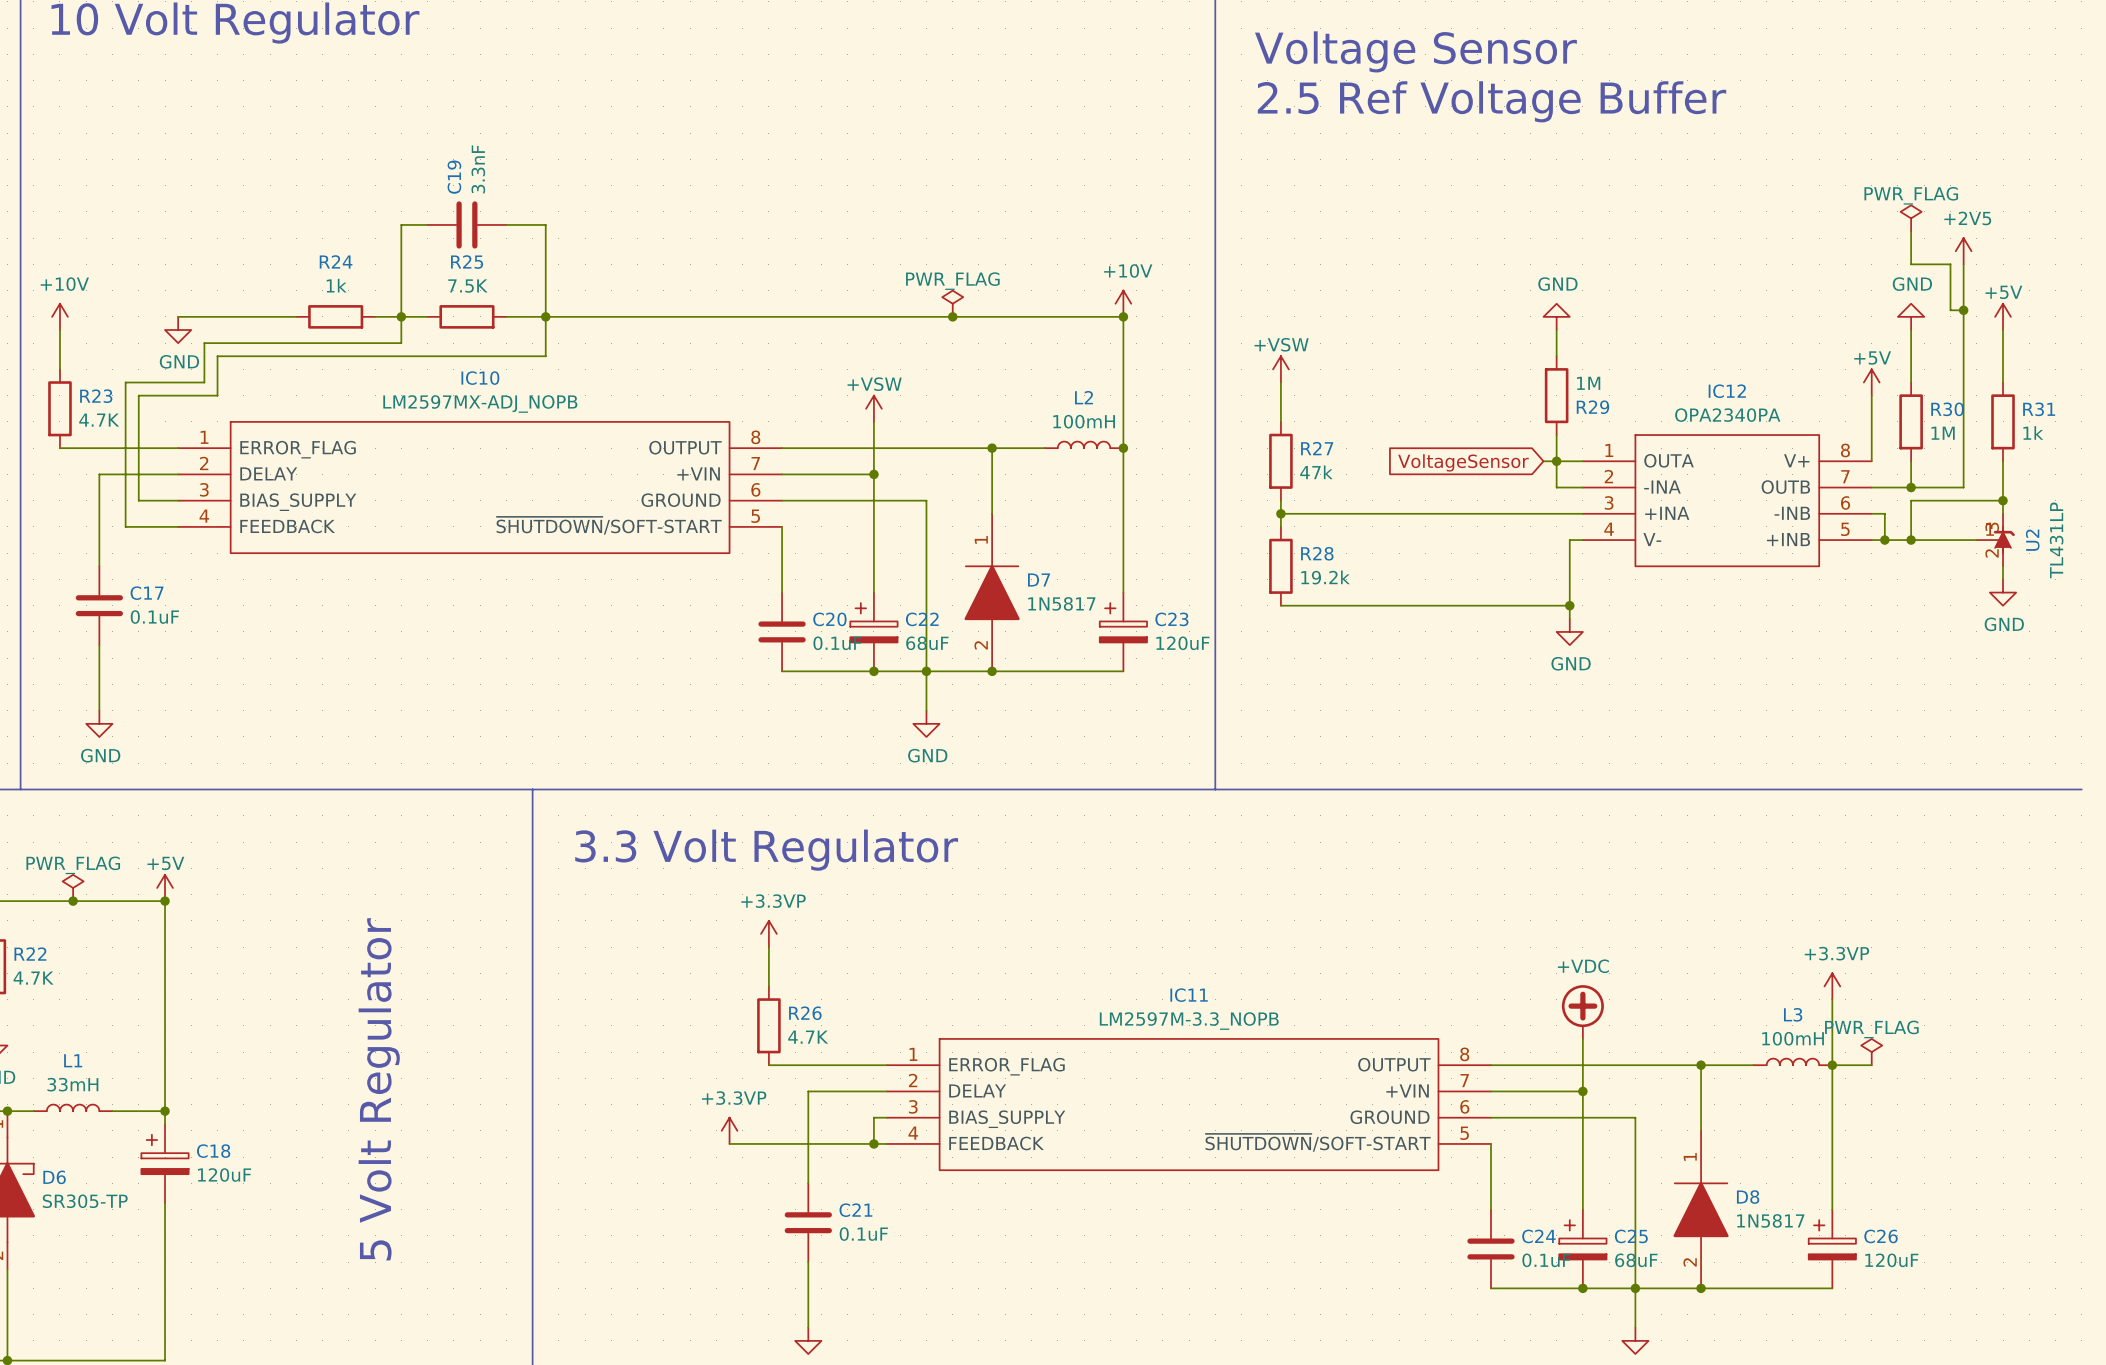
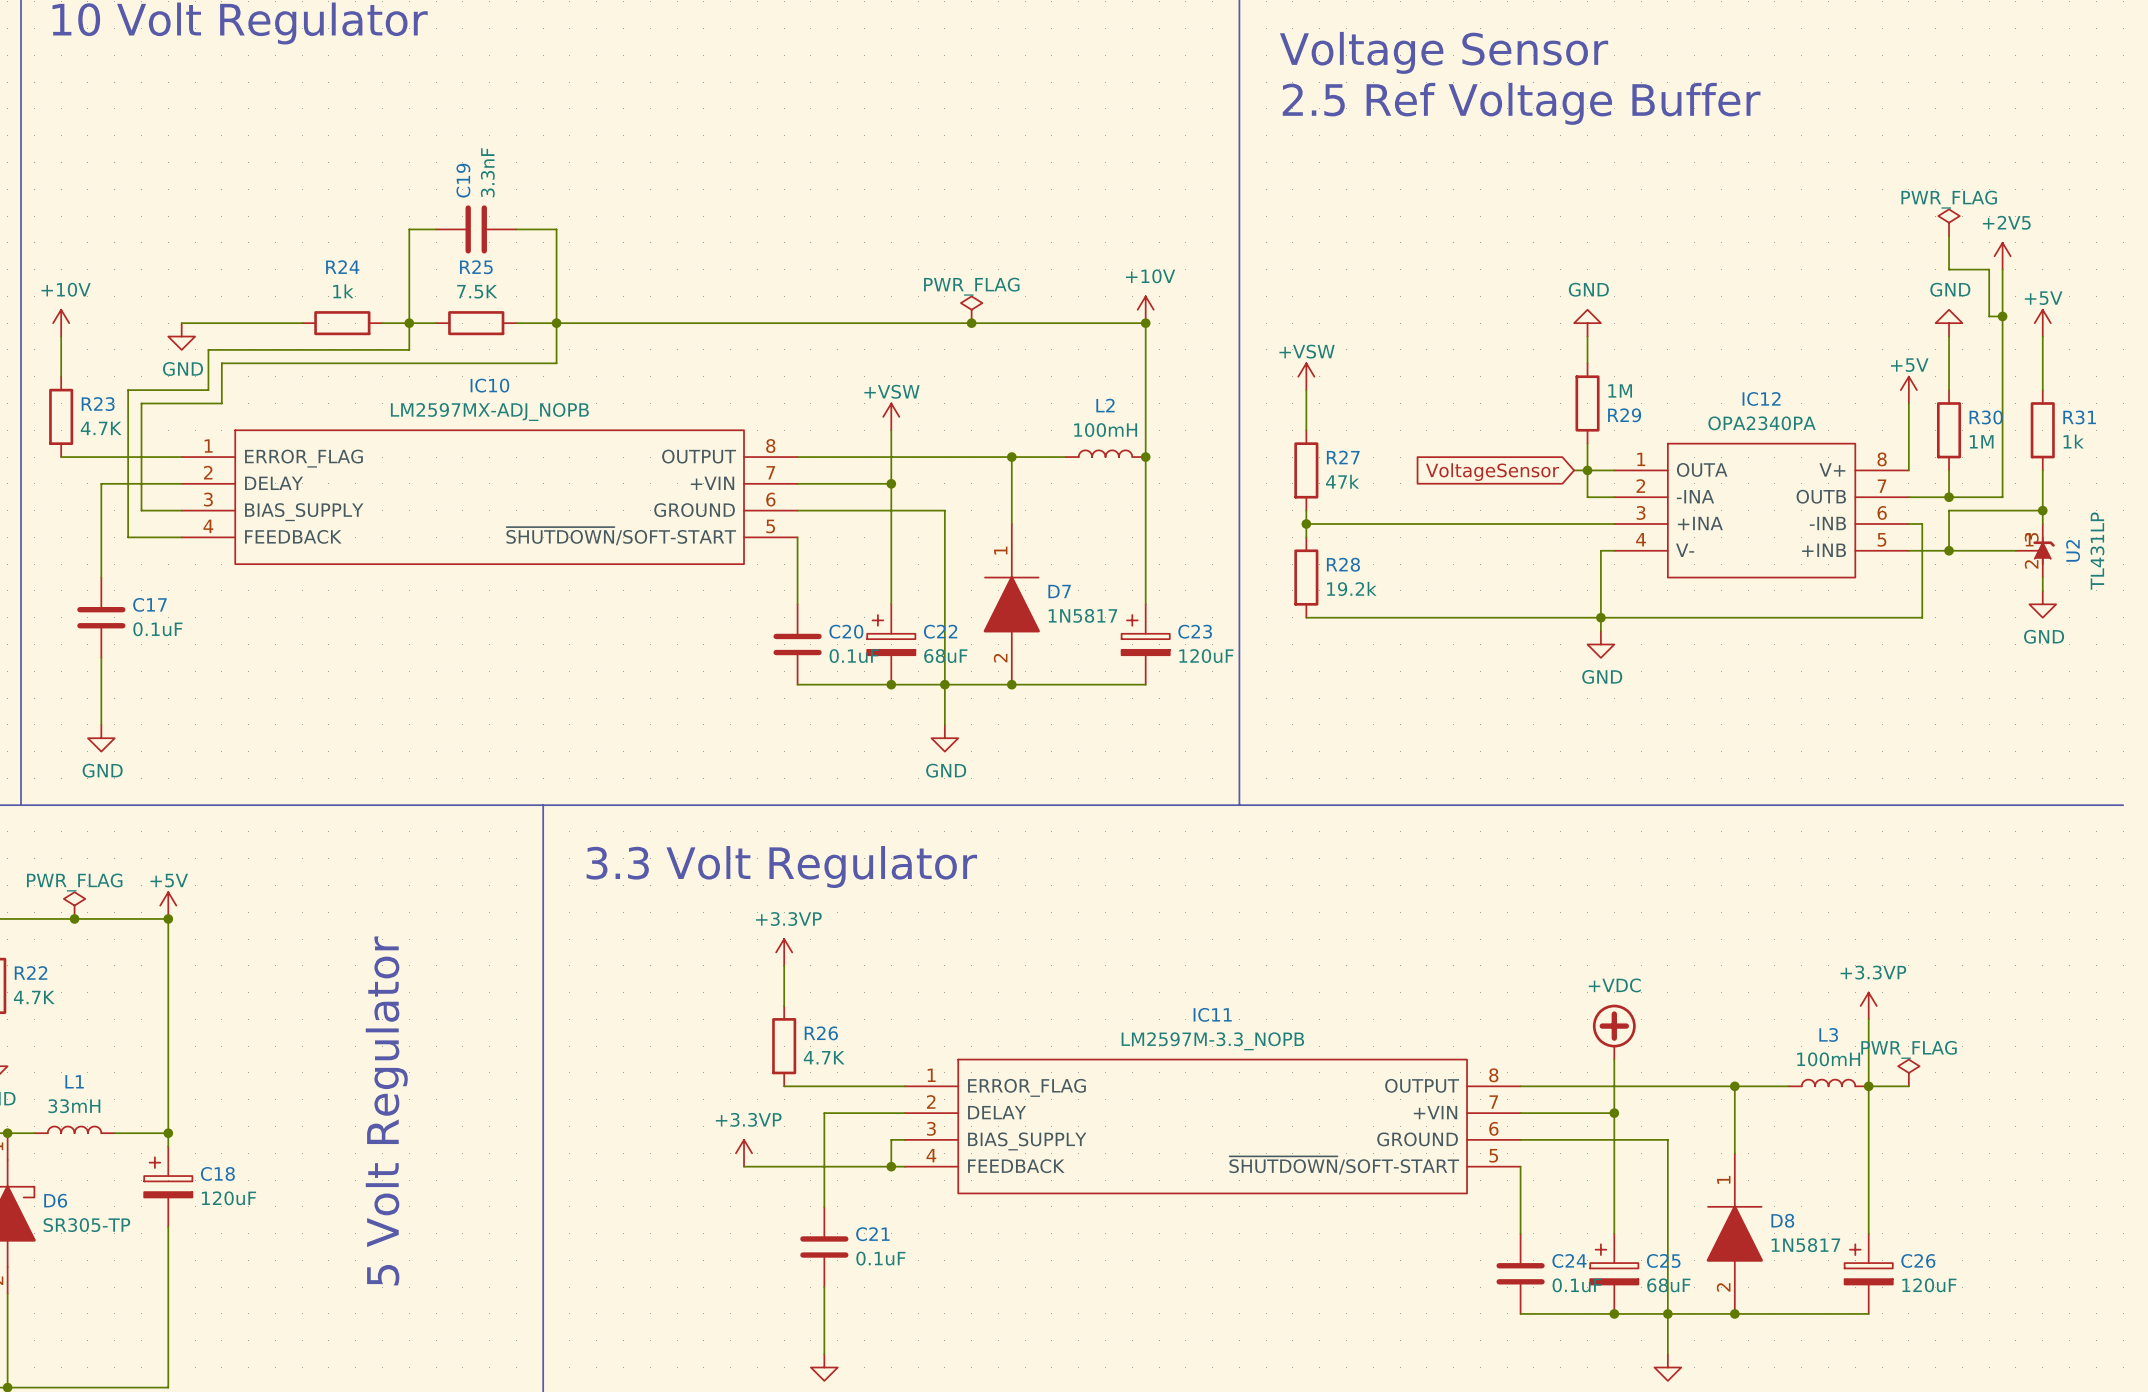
wire: none -> (1922, 550) (1922, 617) (1600, 617)
junction: (1884, 540) -> none

